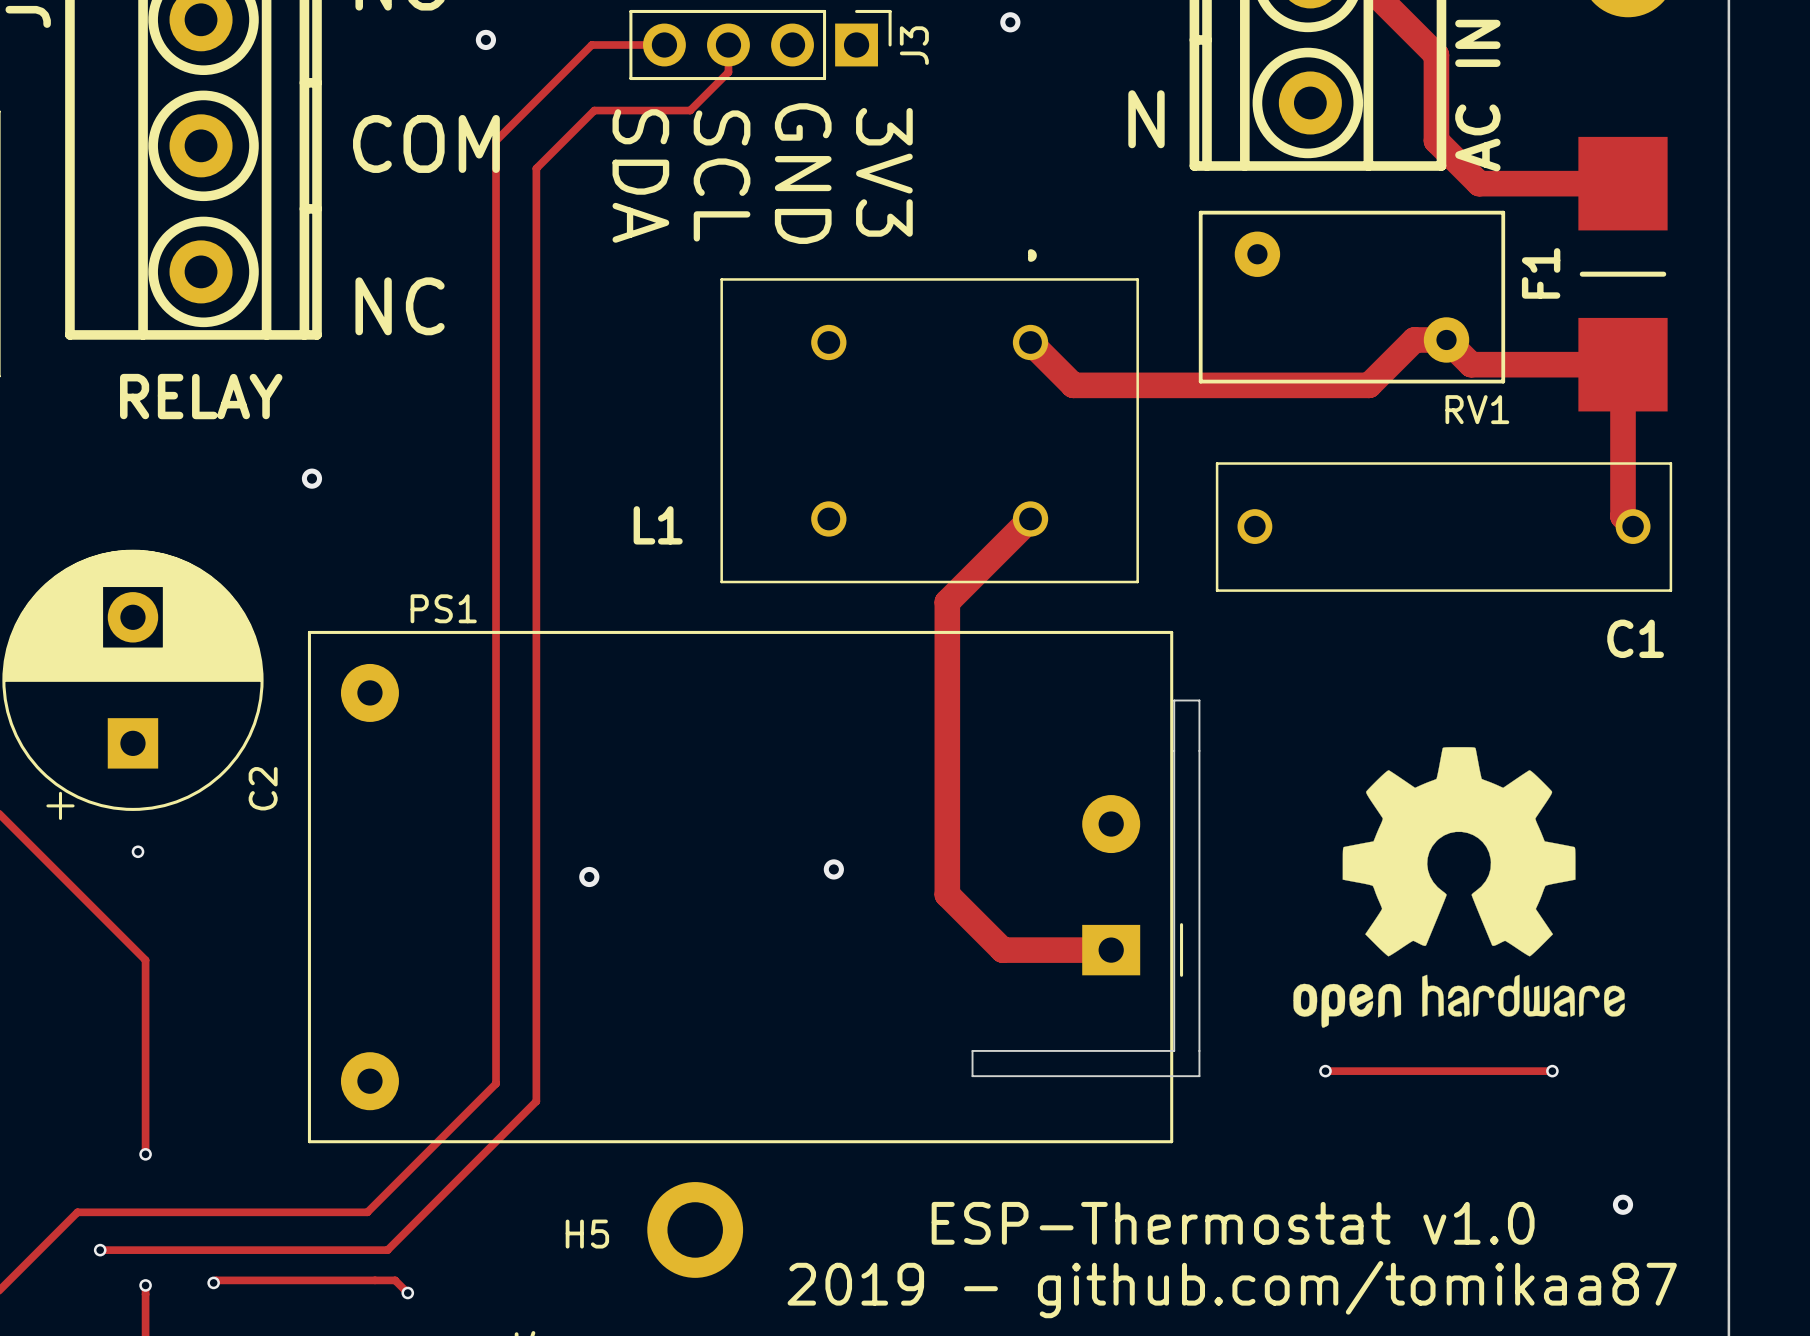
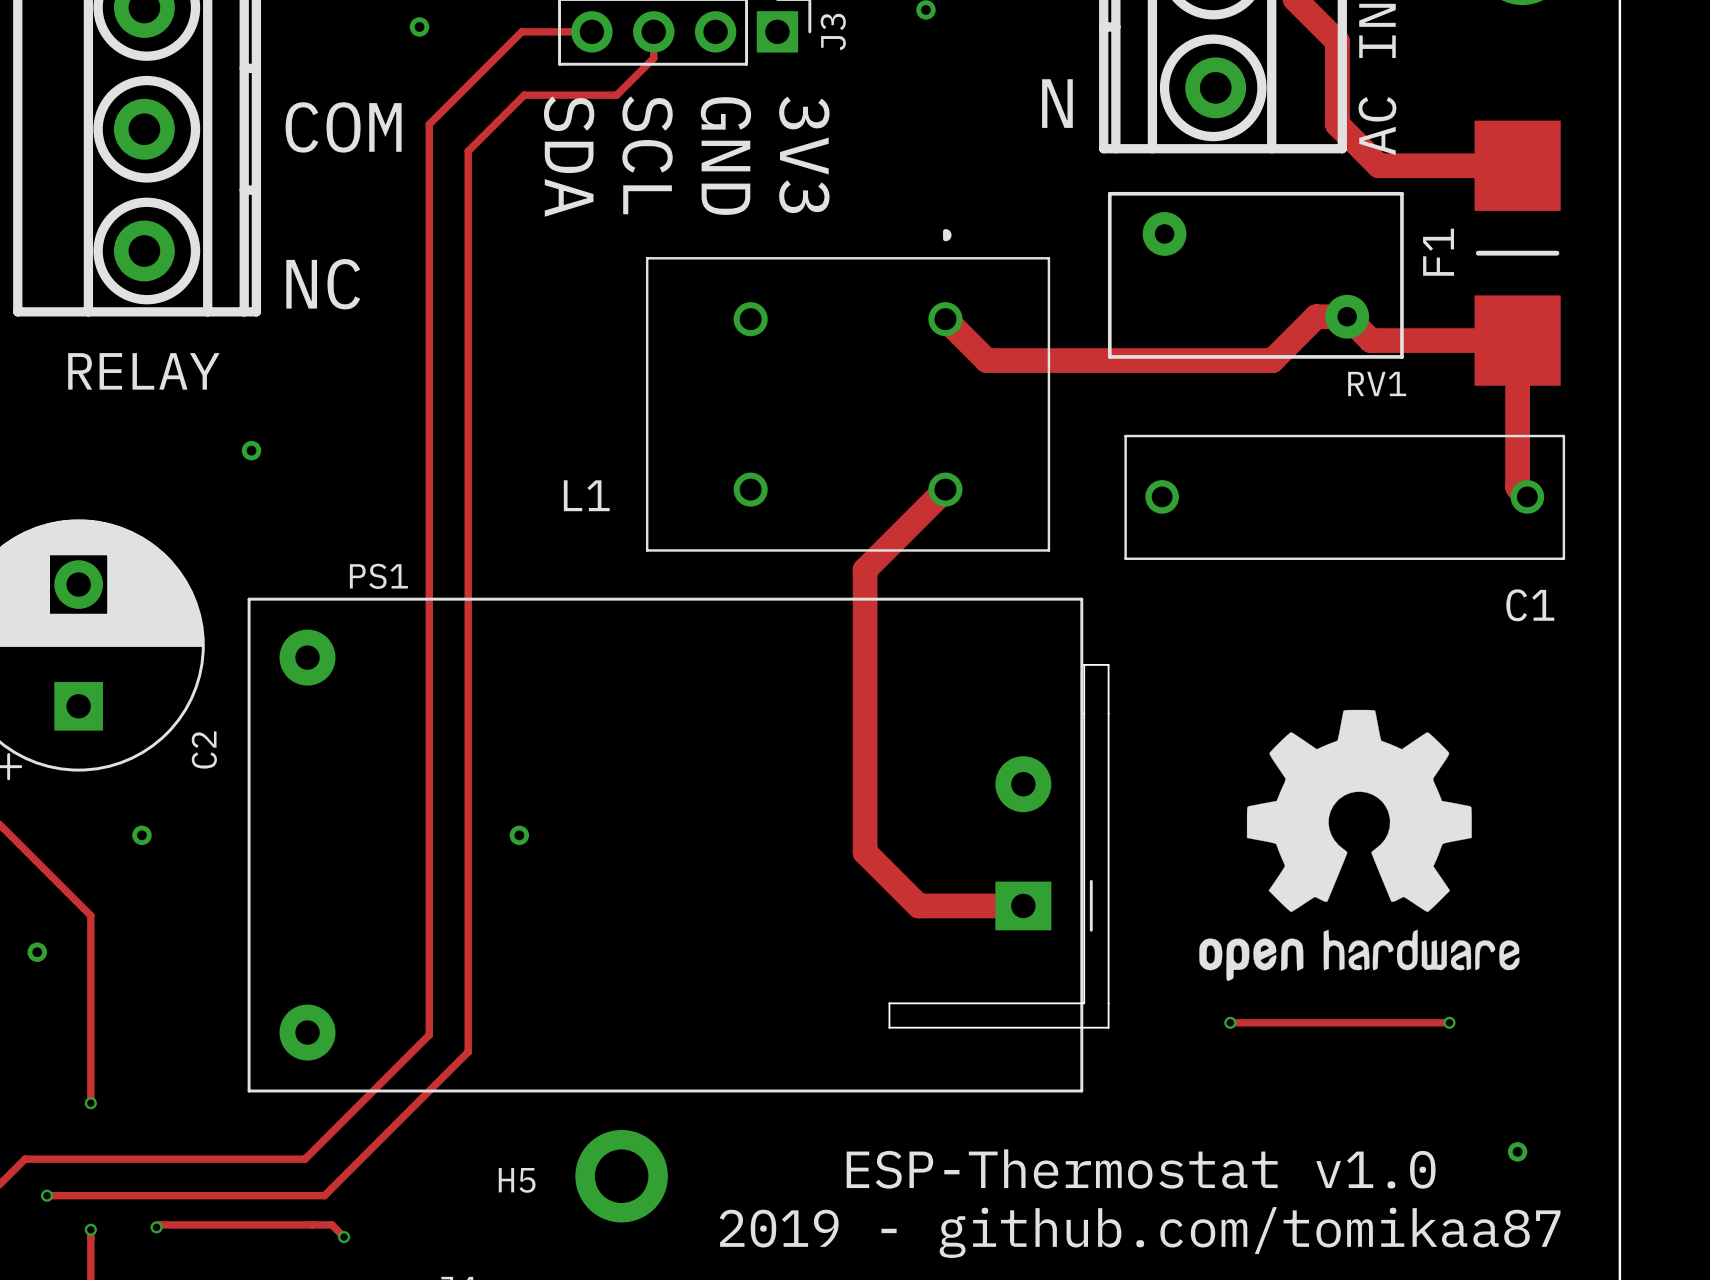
via: (138, 851) -> none
via: (833, 869) -> none
via: none -> (141, 835)
via: none -> (37, 952)

